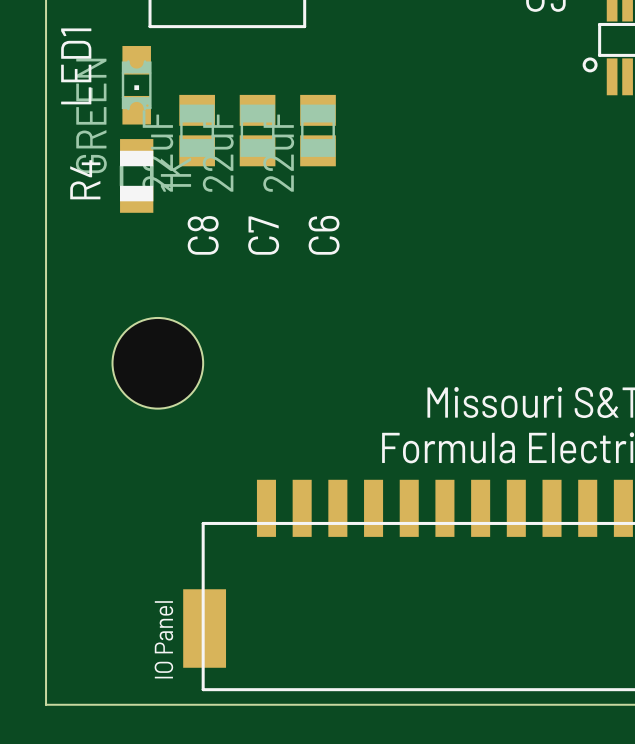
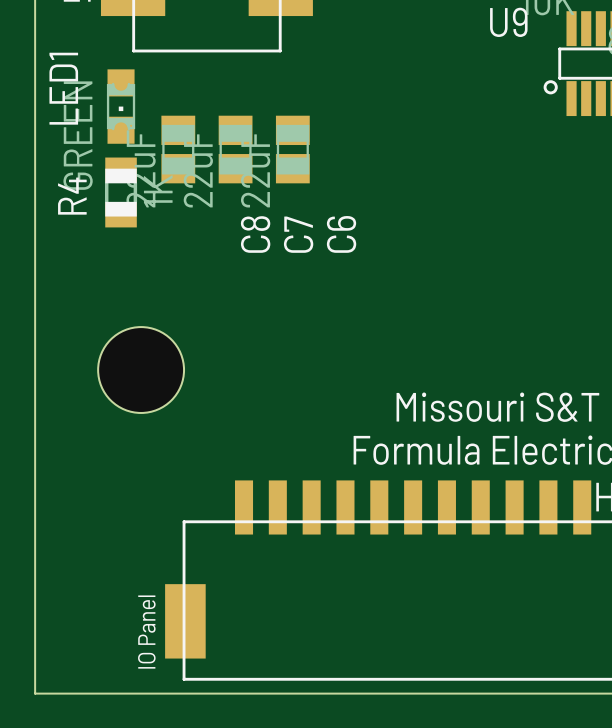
C8 name position: C8 (203, 235) -> C8 (255, 234)
C7 name position: C7 (263, 235) -> C7 (298, 234)
C6 name position: C6 (324, 235) -> C6 (341, 234)

